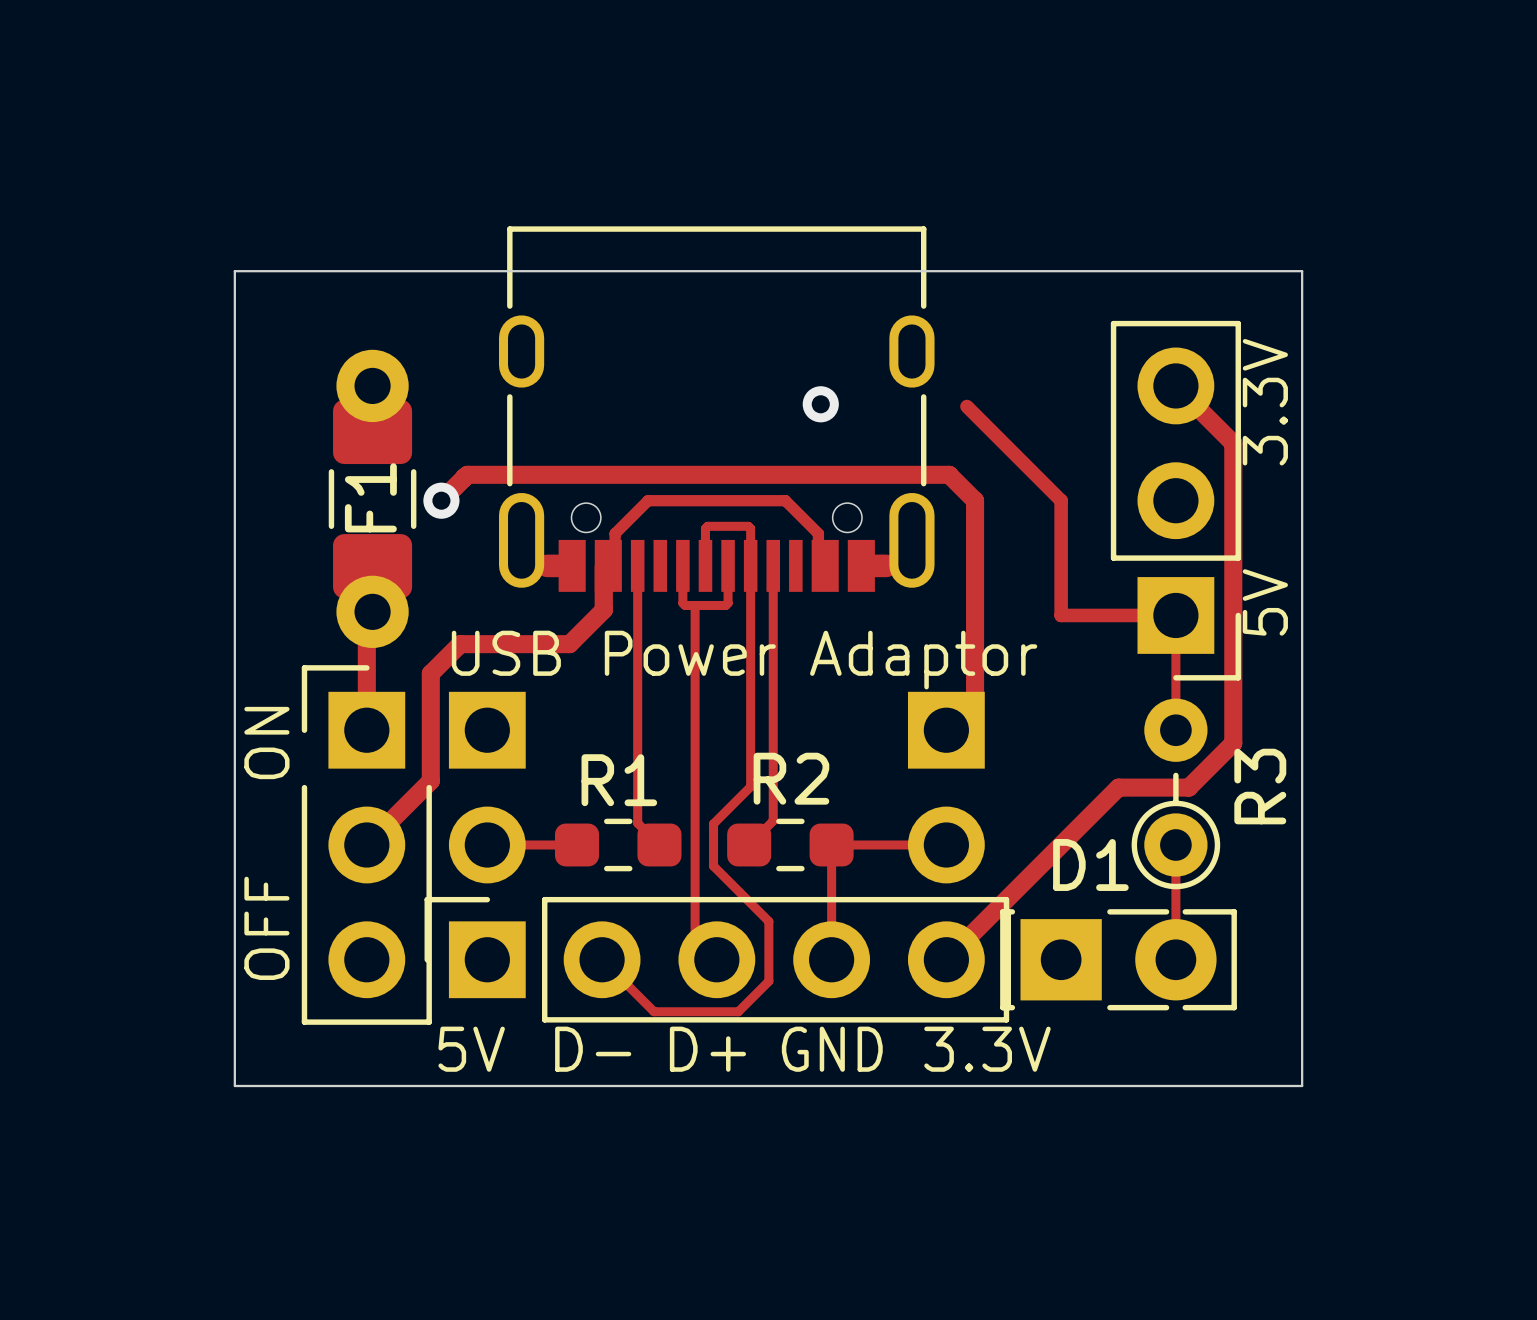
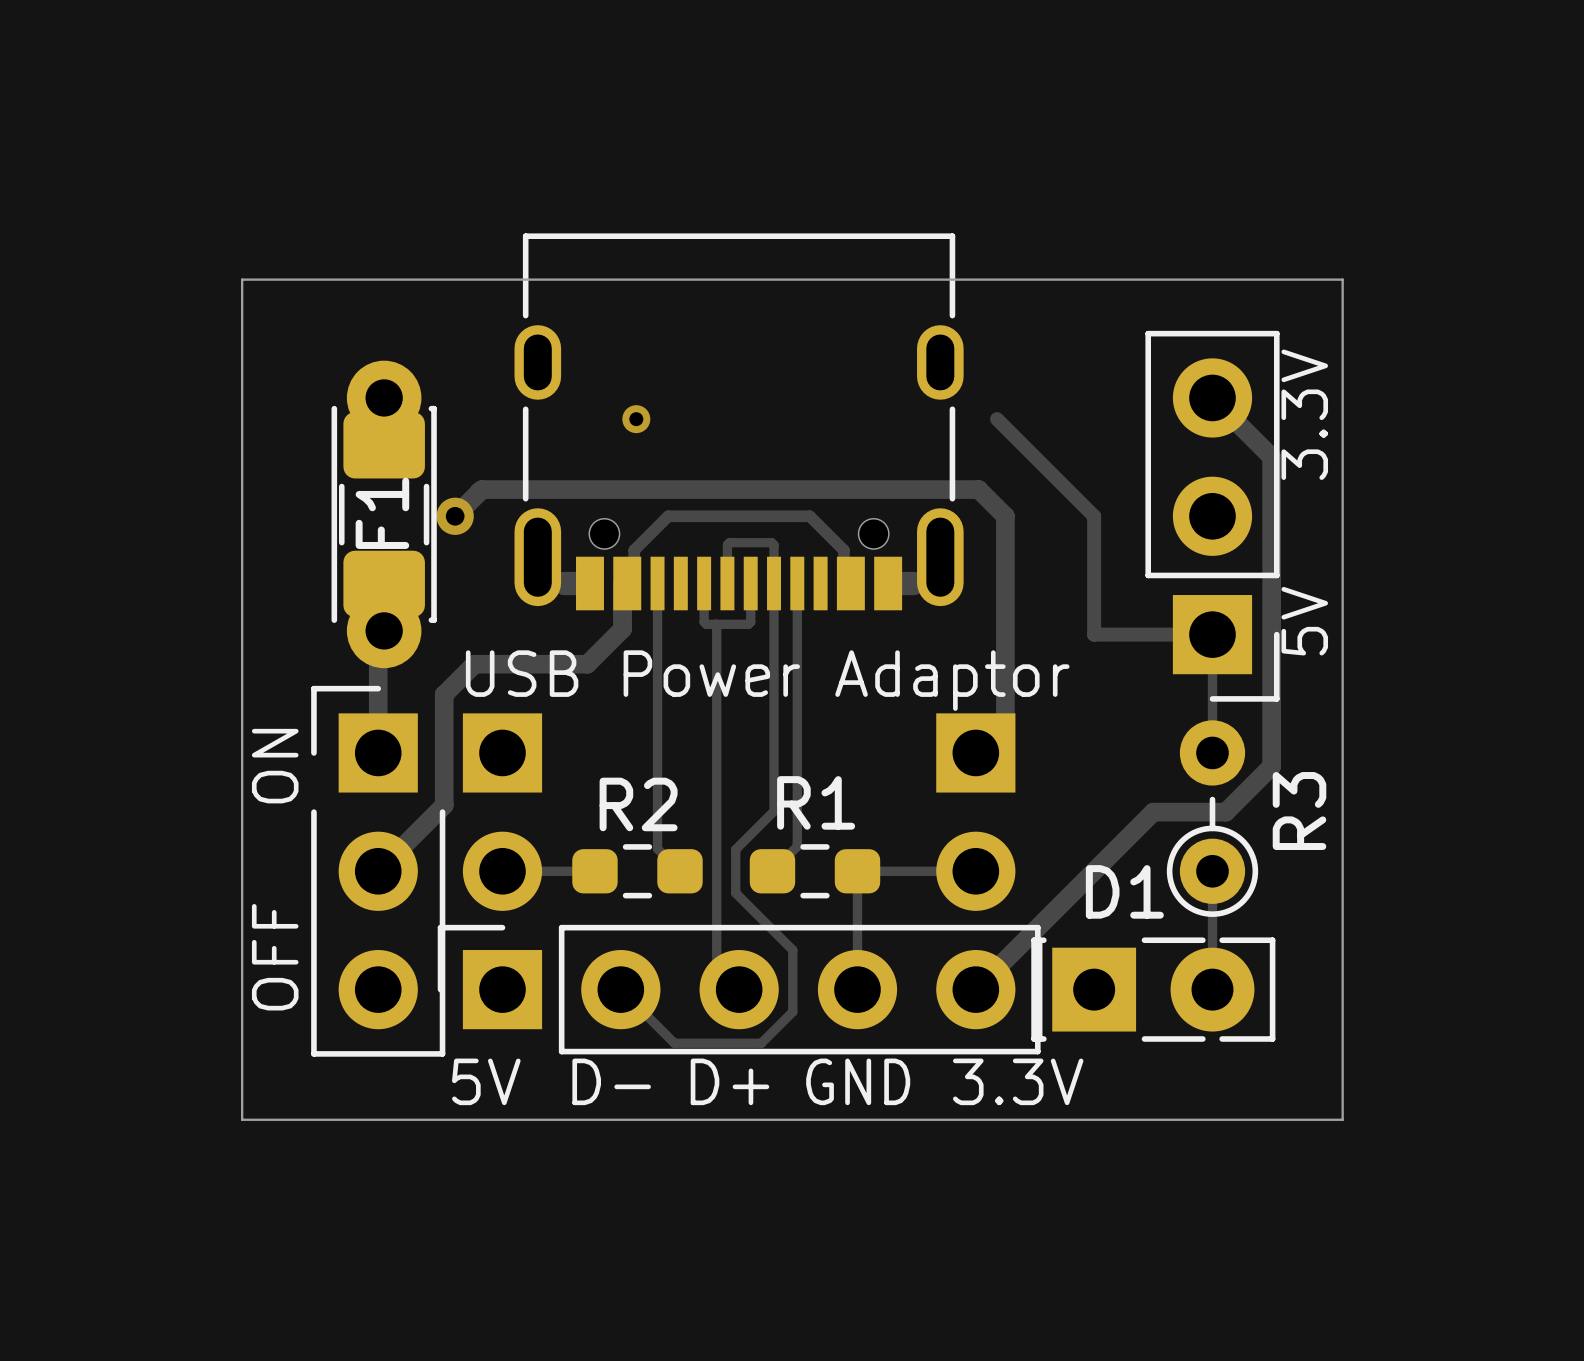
F1 footprint: [336, 349, 409, 649] -> [331, 360, 437, 669]
via: (820, 404) -> none
via: none -> (636, 419)
R2 name: R2 (791, 778) -> R1 (816, 802)
R1 name: R1 (619, 780) -> R2 (638, 804)

